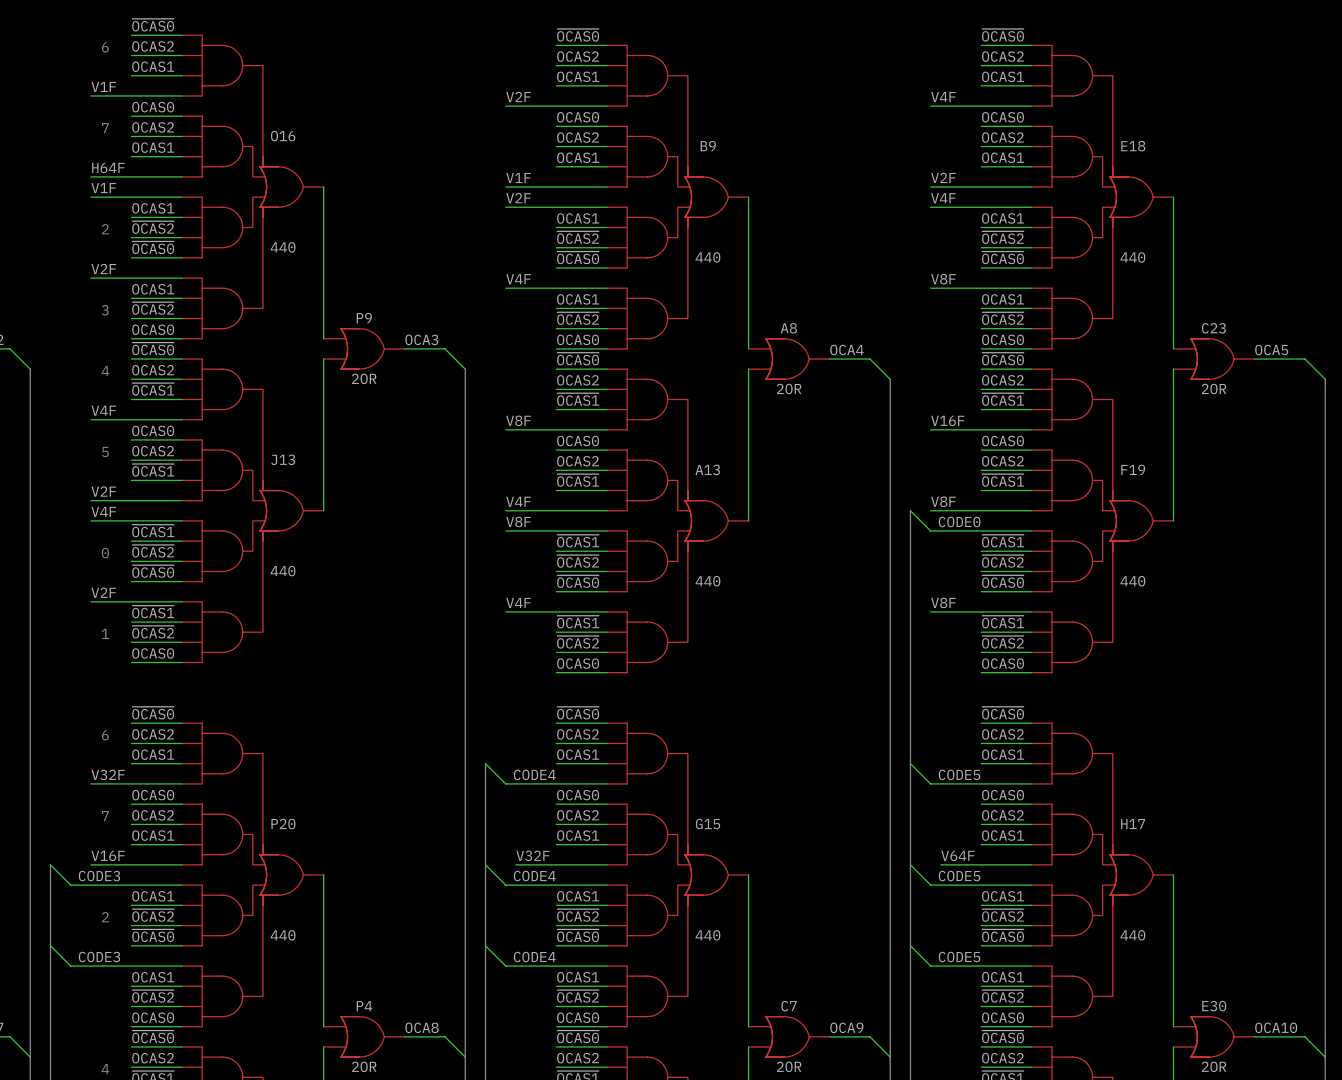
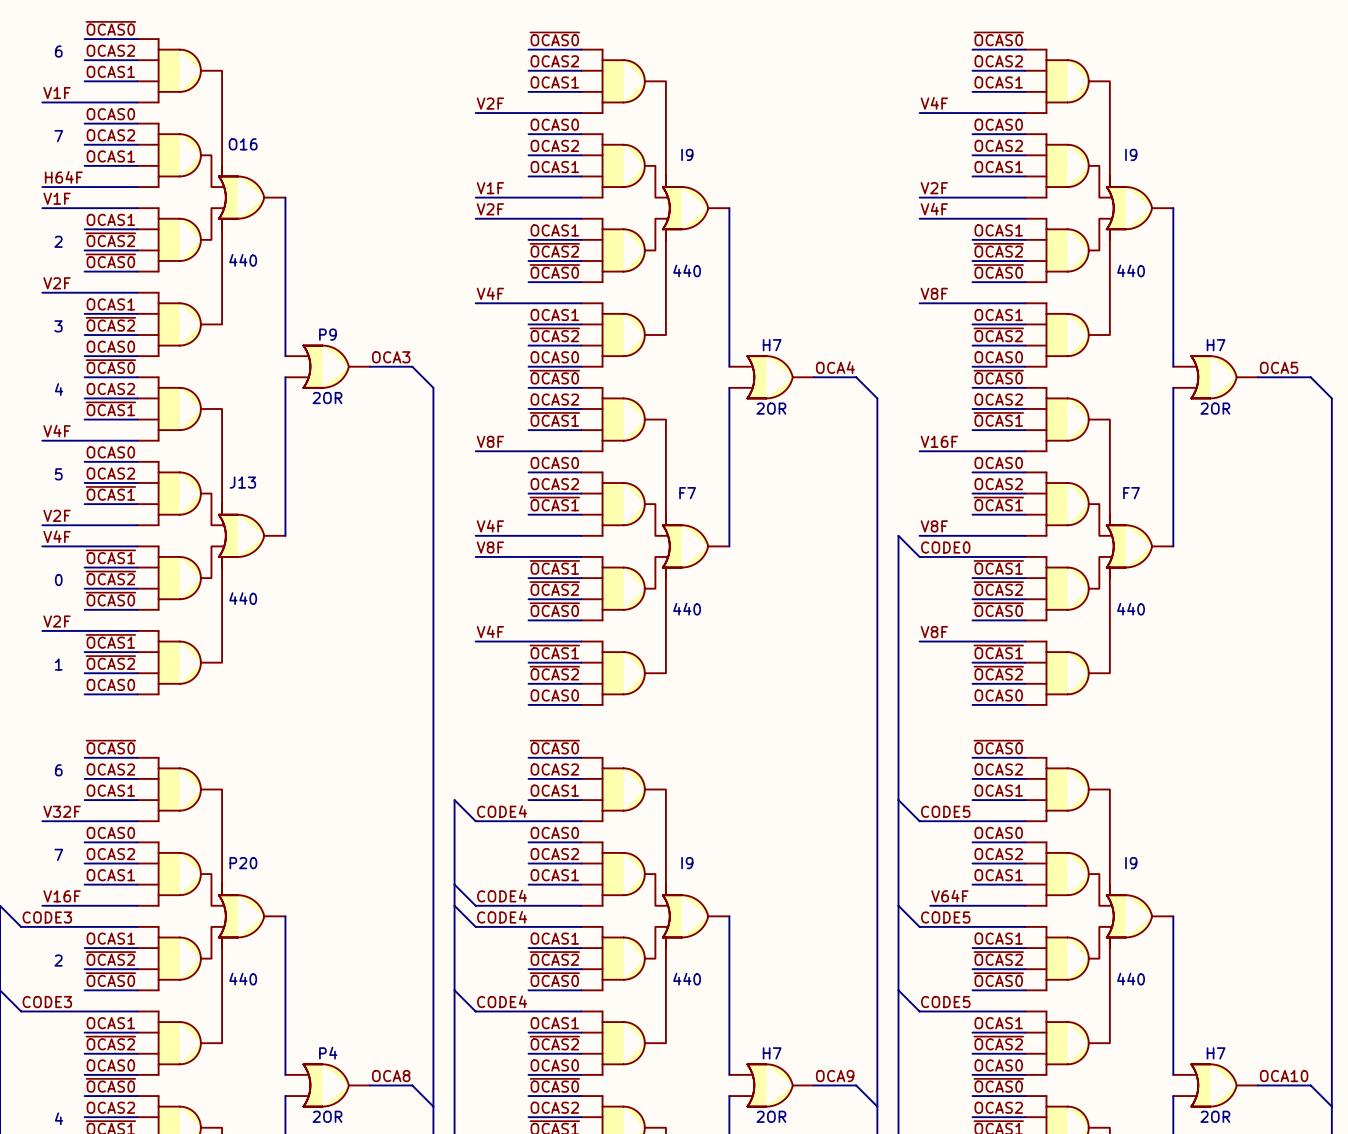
B9 name: B9 (708, 146) -> I9 (687, 154)
E18 name: E18 (1133, 146) -> I9 (1131, 154)
A8 name: A8 (788, 328) -> H7 (772, 345)
C23 name: C23 (1213, 328) -> H7 (1216, 345)
A13 name: A13 (707, 469) -> F7 (687, 493)
F19 name: F19 (1133, 469) -> F7 (1131, 493)
G15 name: G15 (708, 824) -> I9 (687, 863)
H17 name: H17 (1133, 824) -> I9 (1131, 863)
wire: none -> (454, 884) (475, 905) (486, 905)
label: V32F (533, 855) -> none
label: none -> CODE4 (502, 896)
C7 name: C7 (789, 1006) -> H7 (772, 1053)
E30 name: E30 (1214, 1006) -> H7 (1216, 1053)

